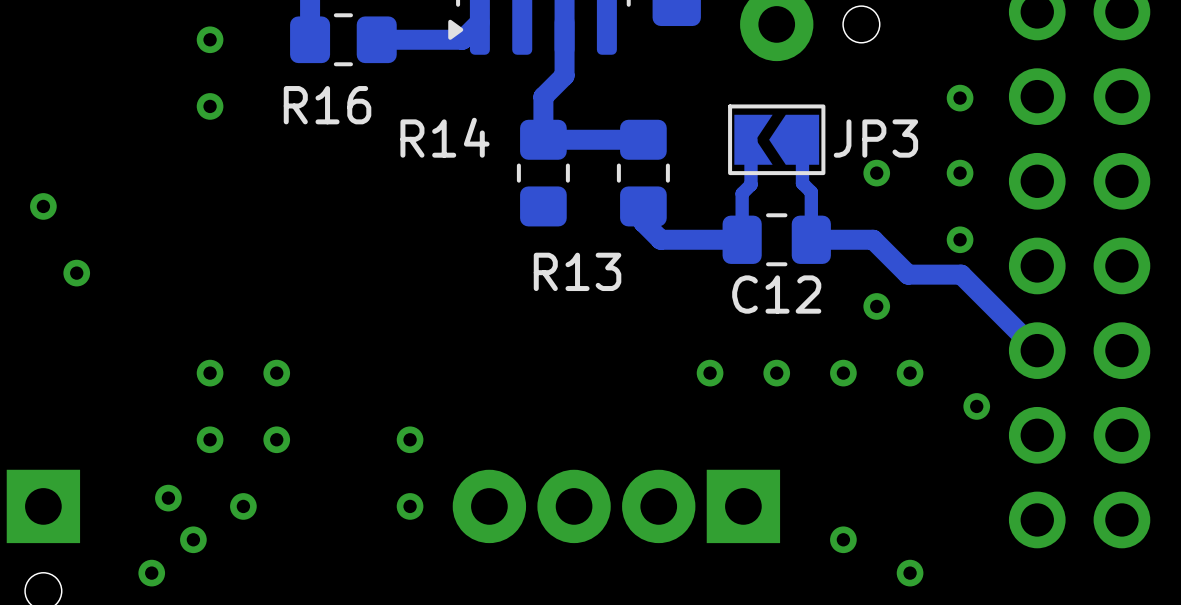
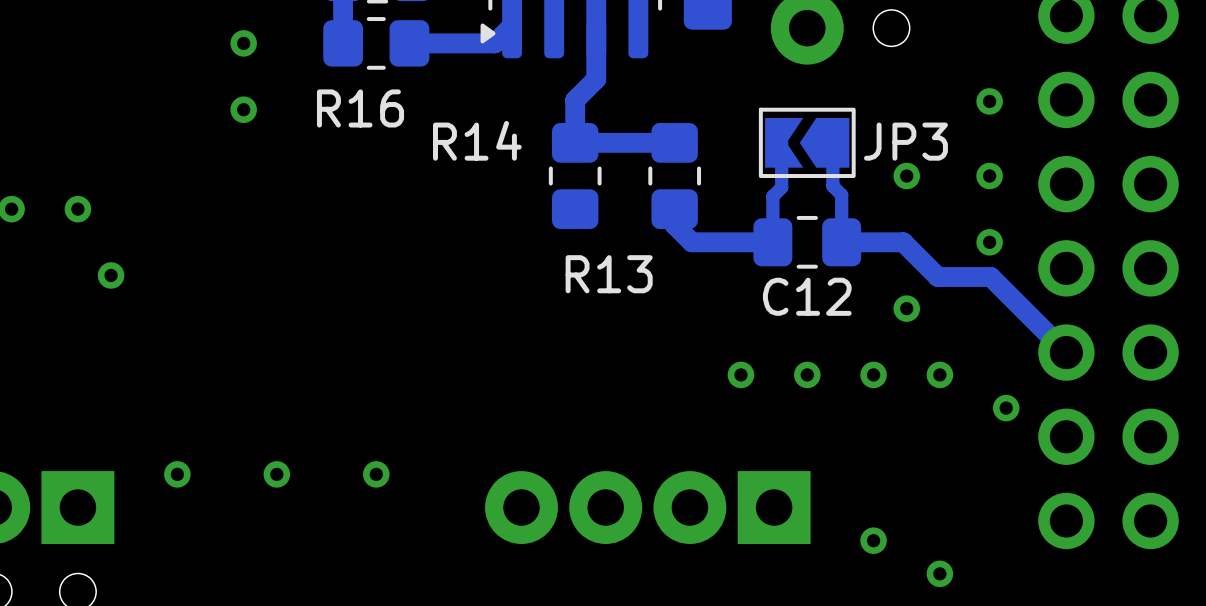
via: (210, 373) -> none
via: (276, 373) -> none
via: (210, 439) -> none
via: (276, 439) -> none
via: (410, 439) -> none
via: none -> (276, 474)
via: none -> (376, 474)
via position: (168, 498) -> (177, 474)
via: (243, 506) -> none
via: (410, 506) -> none
via: (193, 539) -> none
via: (151, 573) -> none

